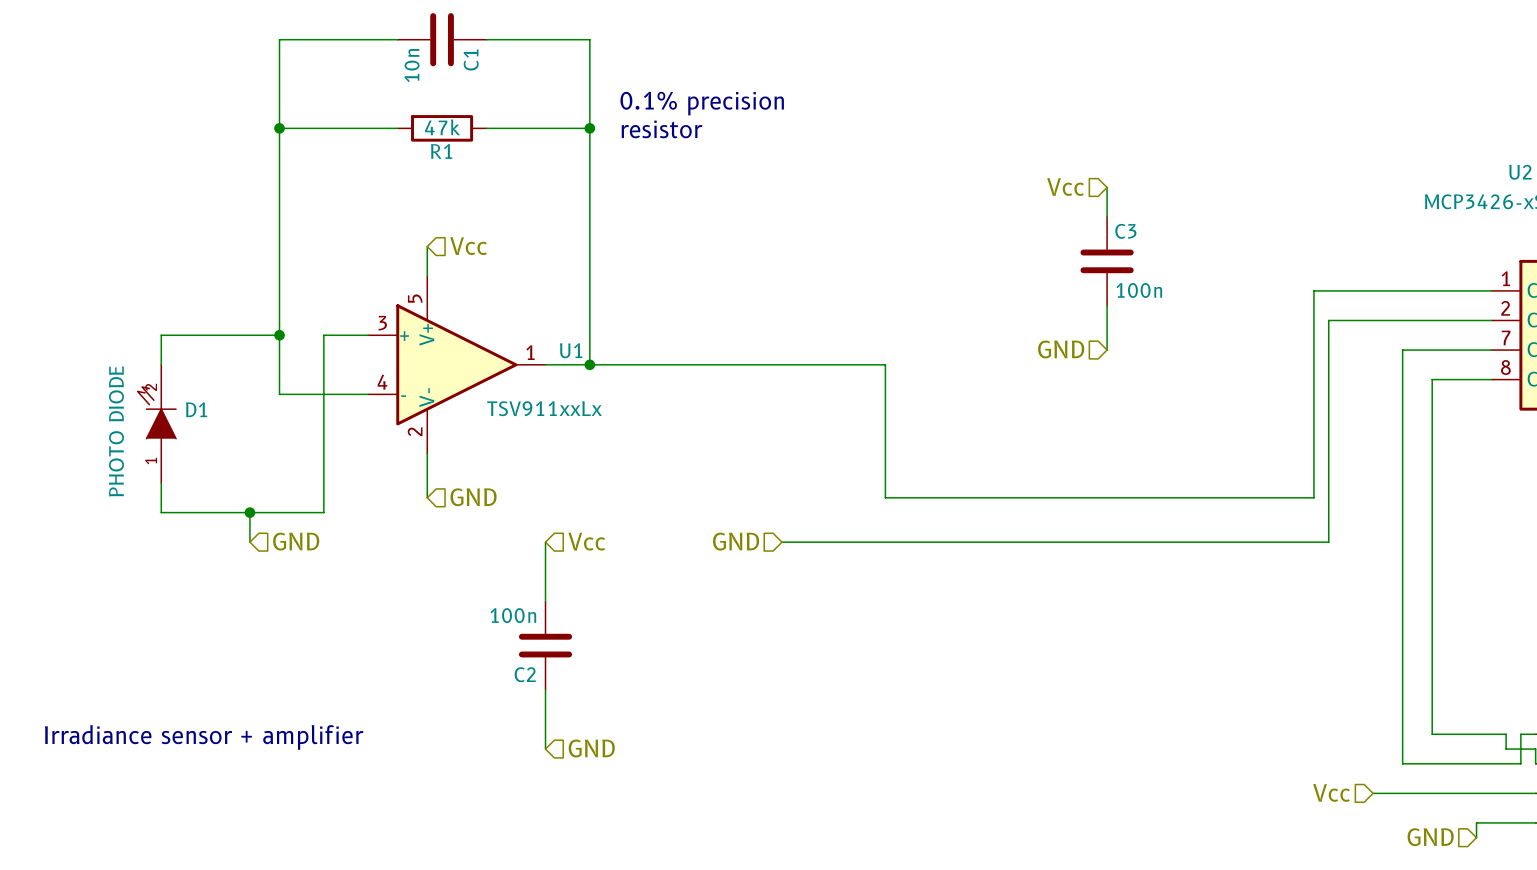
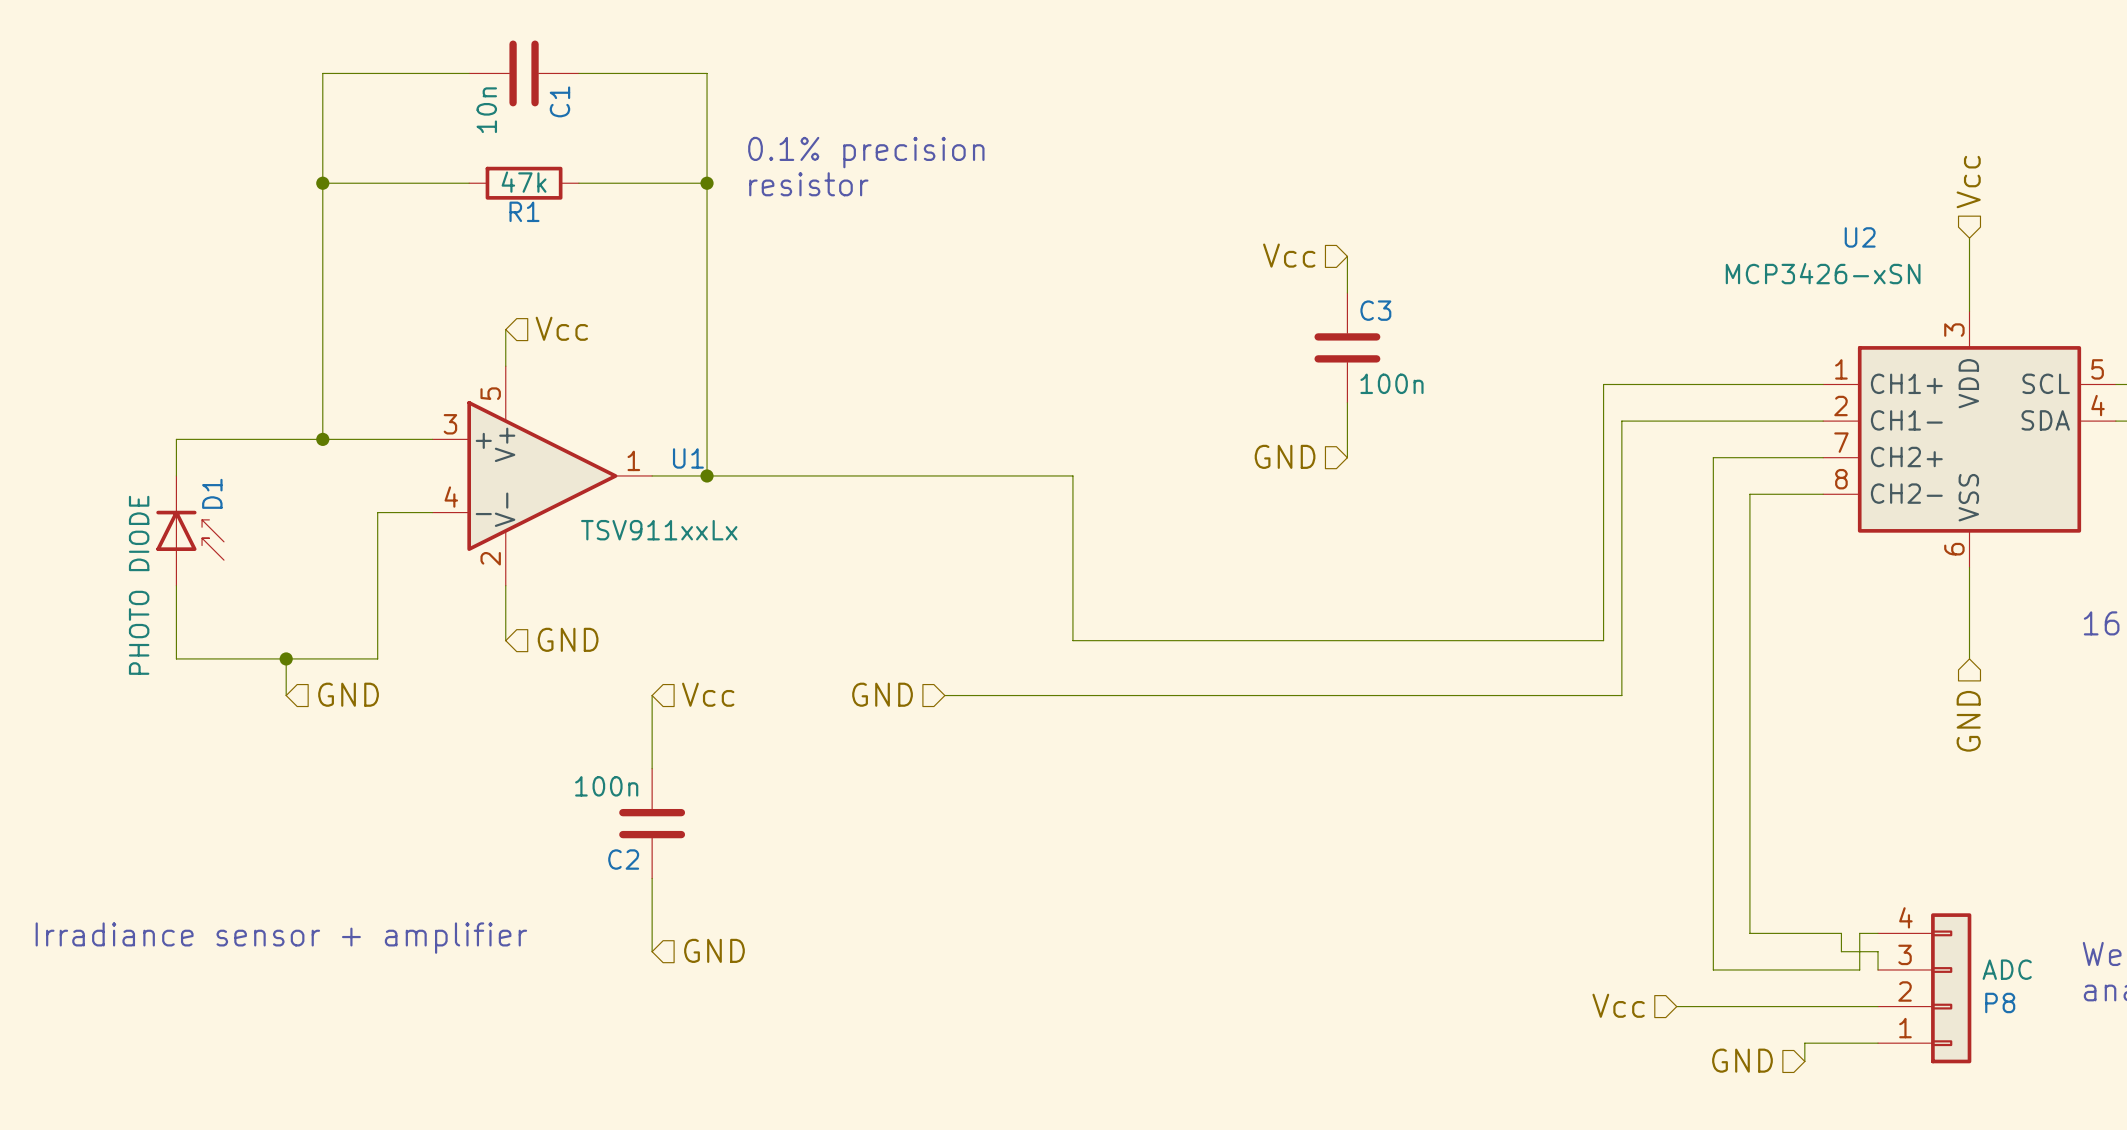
wire: (279, 335) (279, 394) (323, 394) (323, 335) -> (322, 439) (377, 439)
D1 symbol: [137, 364, 177, 484] -> [156, 475, 224, 586]
D1 name position: D1 (196, 409) -> D1 (212, 493)

